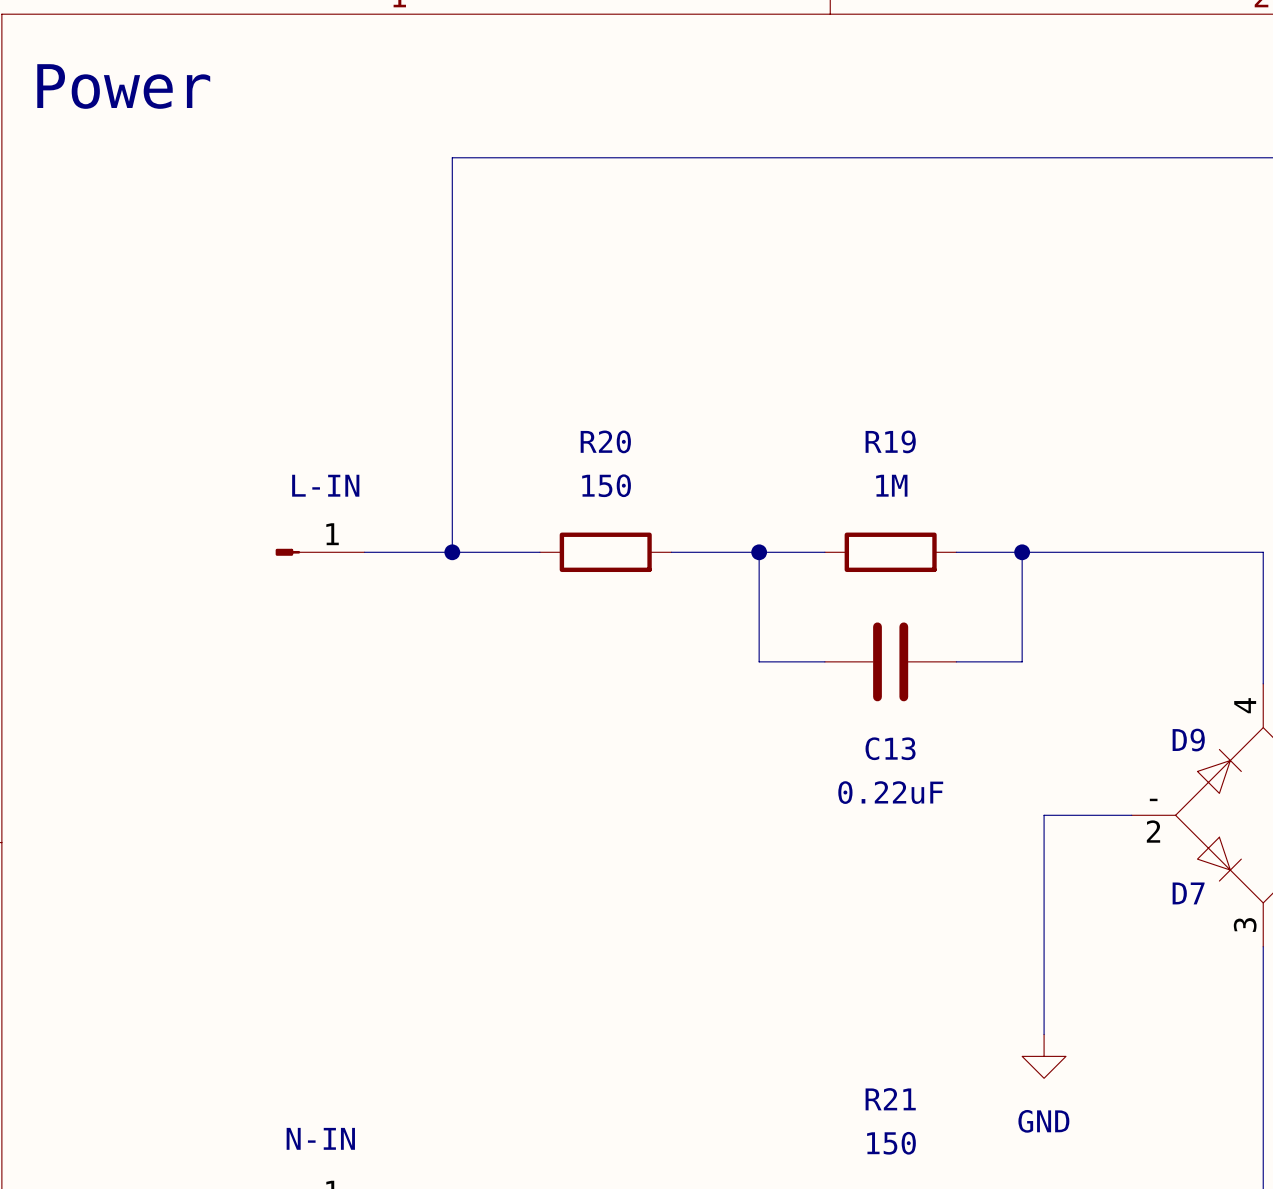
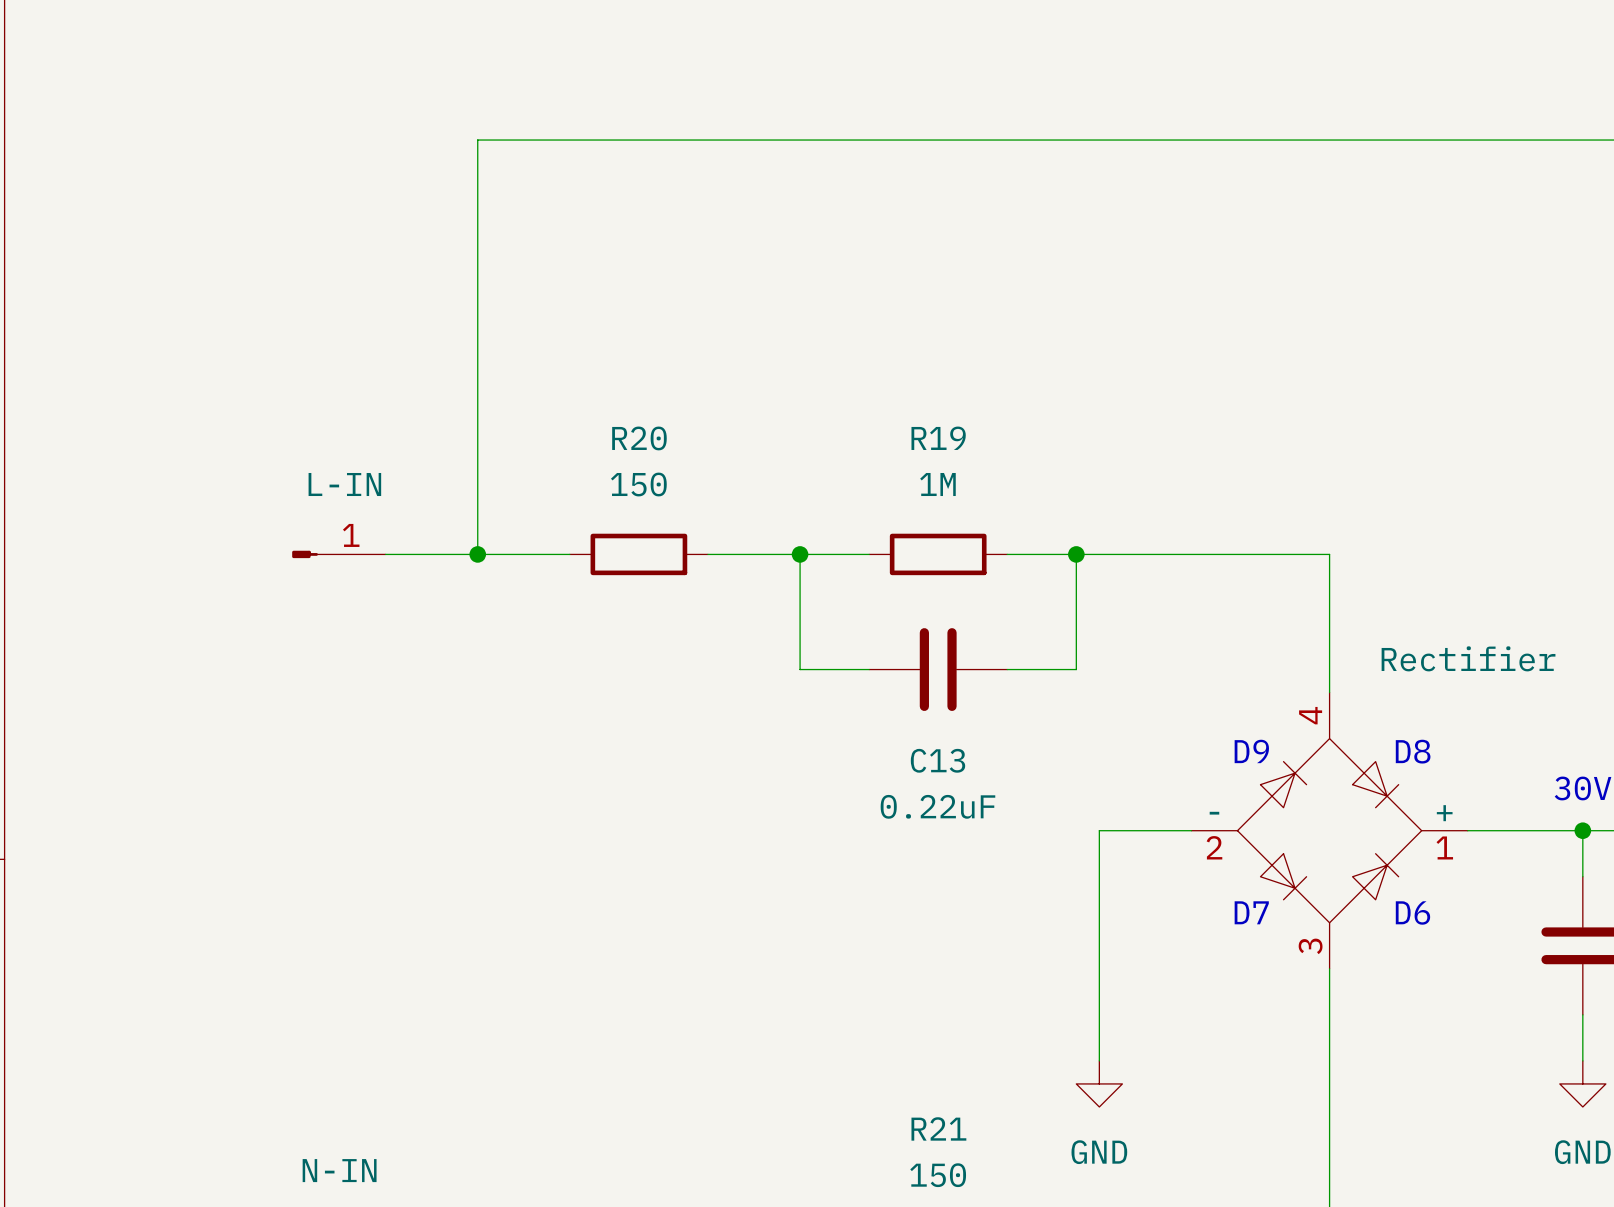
text: Power (123, 86) -> none

